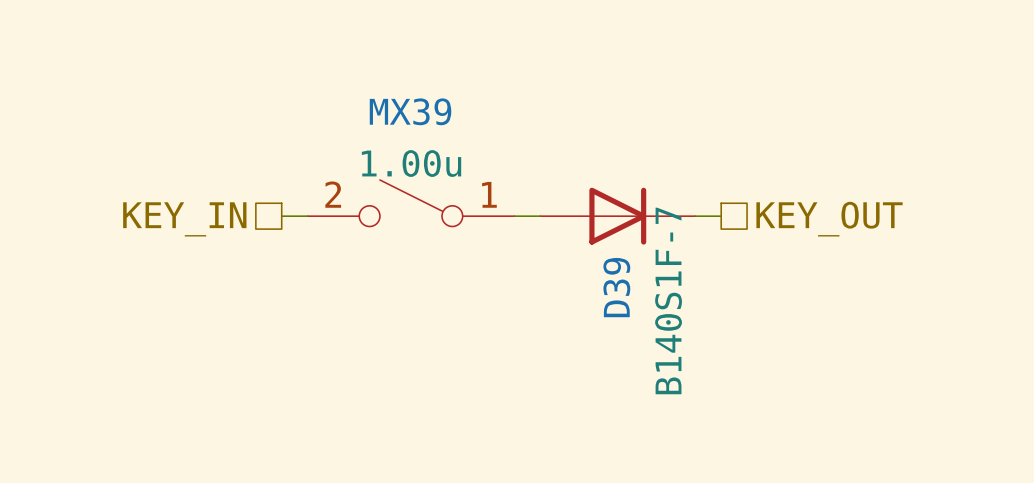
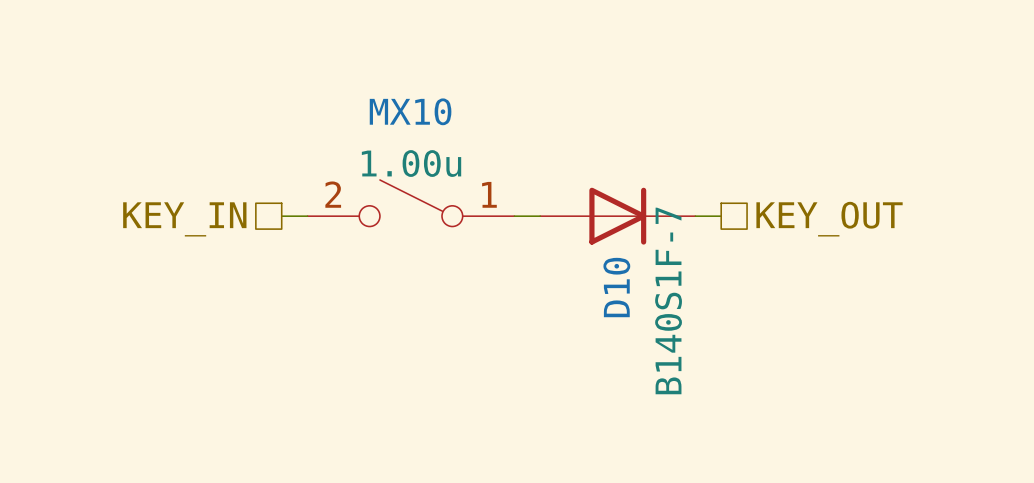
MX39 name: MX39 (410, 111) -> MX10 (410, 111)
D39 name: D39 (616, 287) -> D10 (616, 287)

